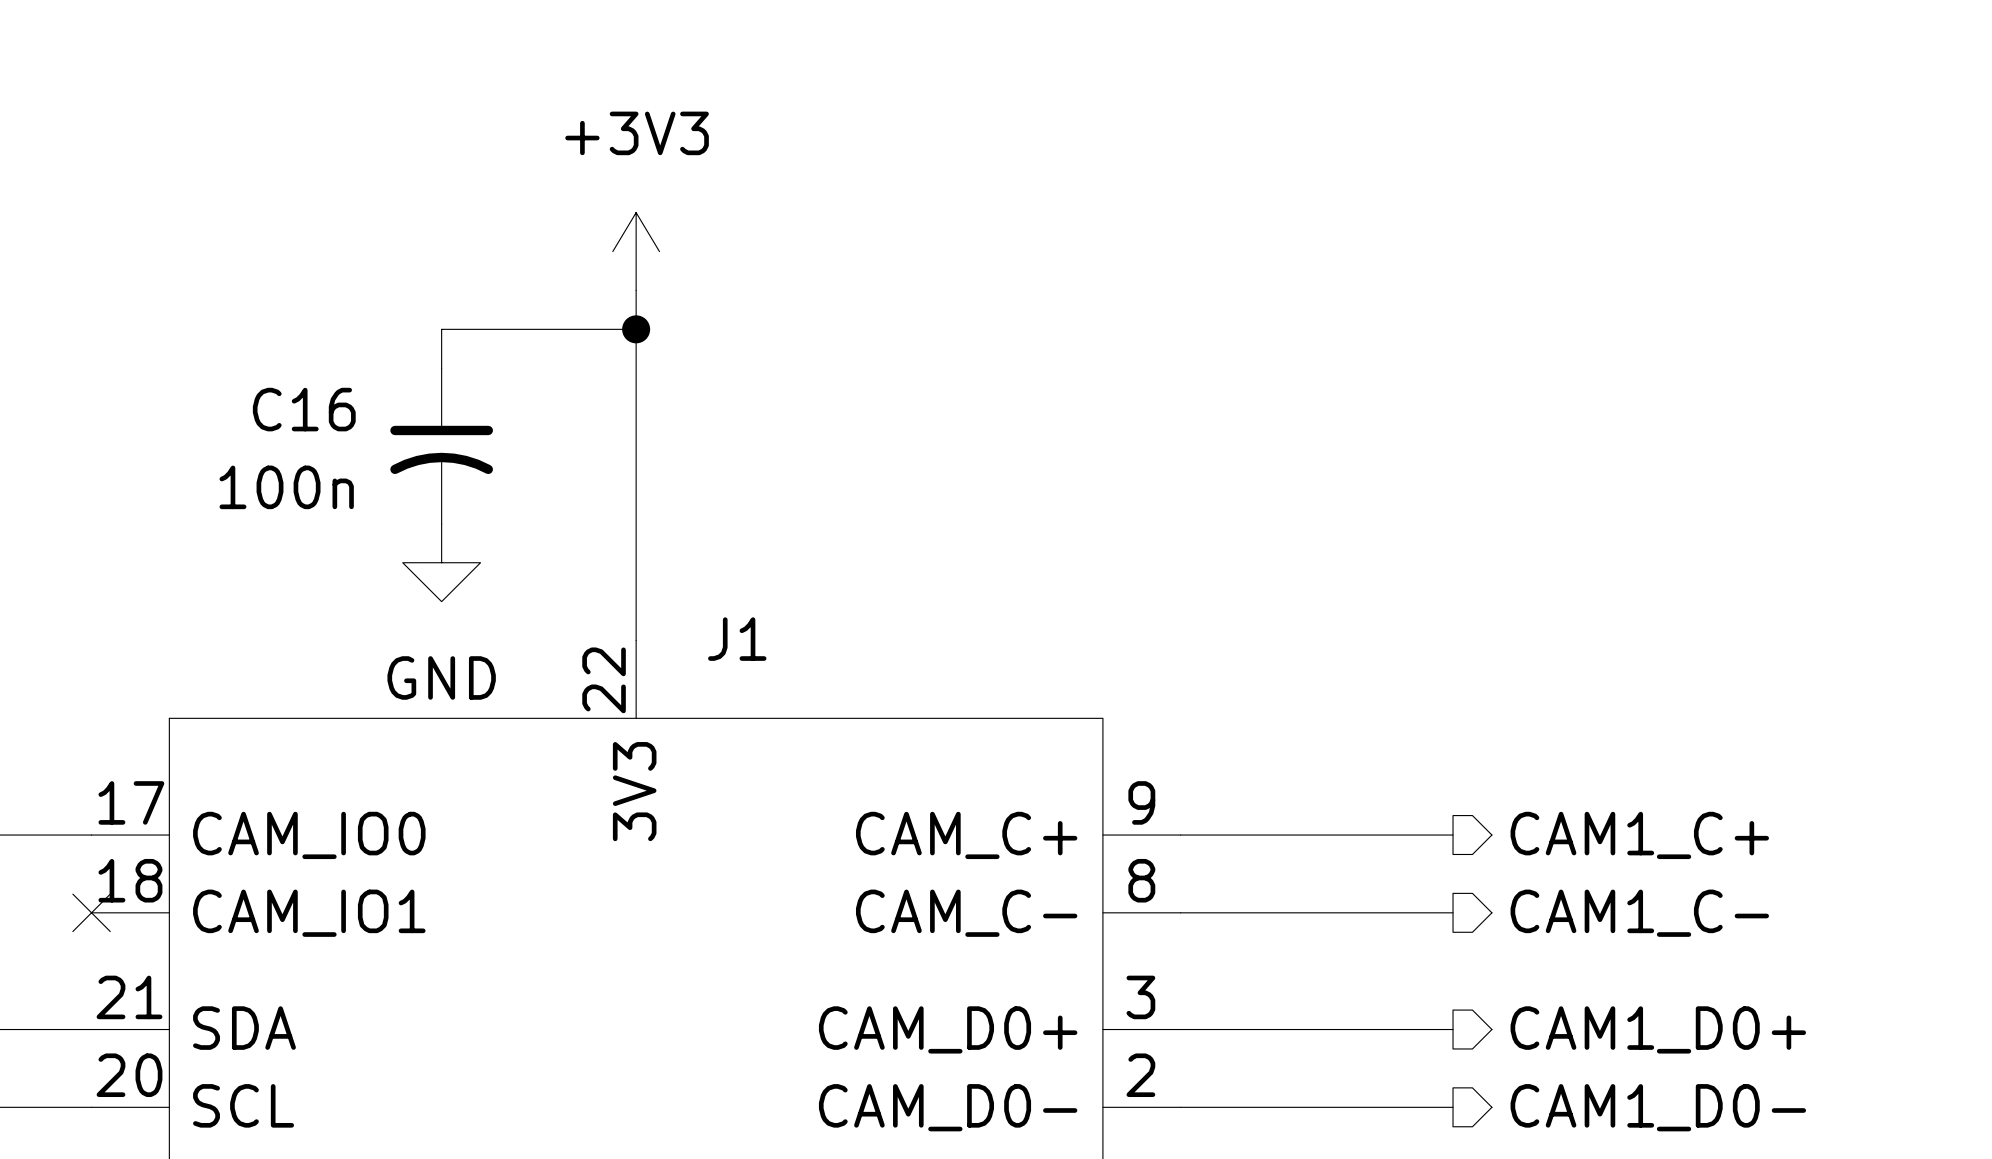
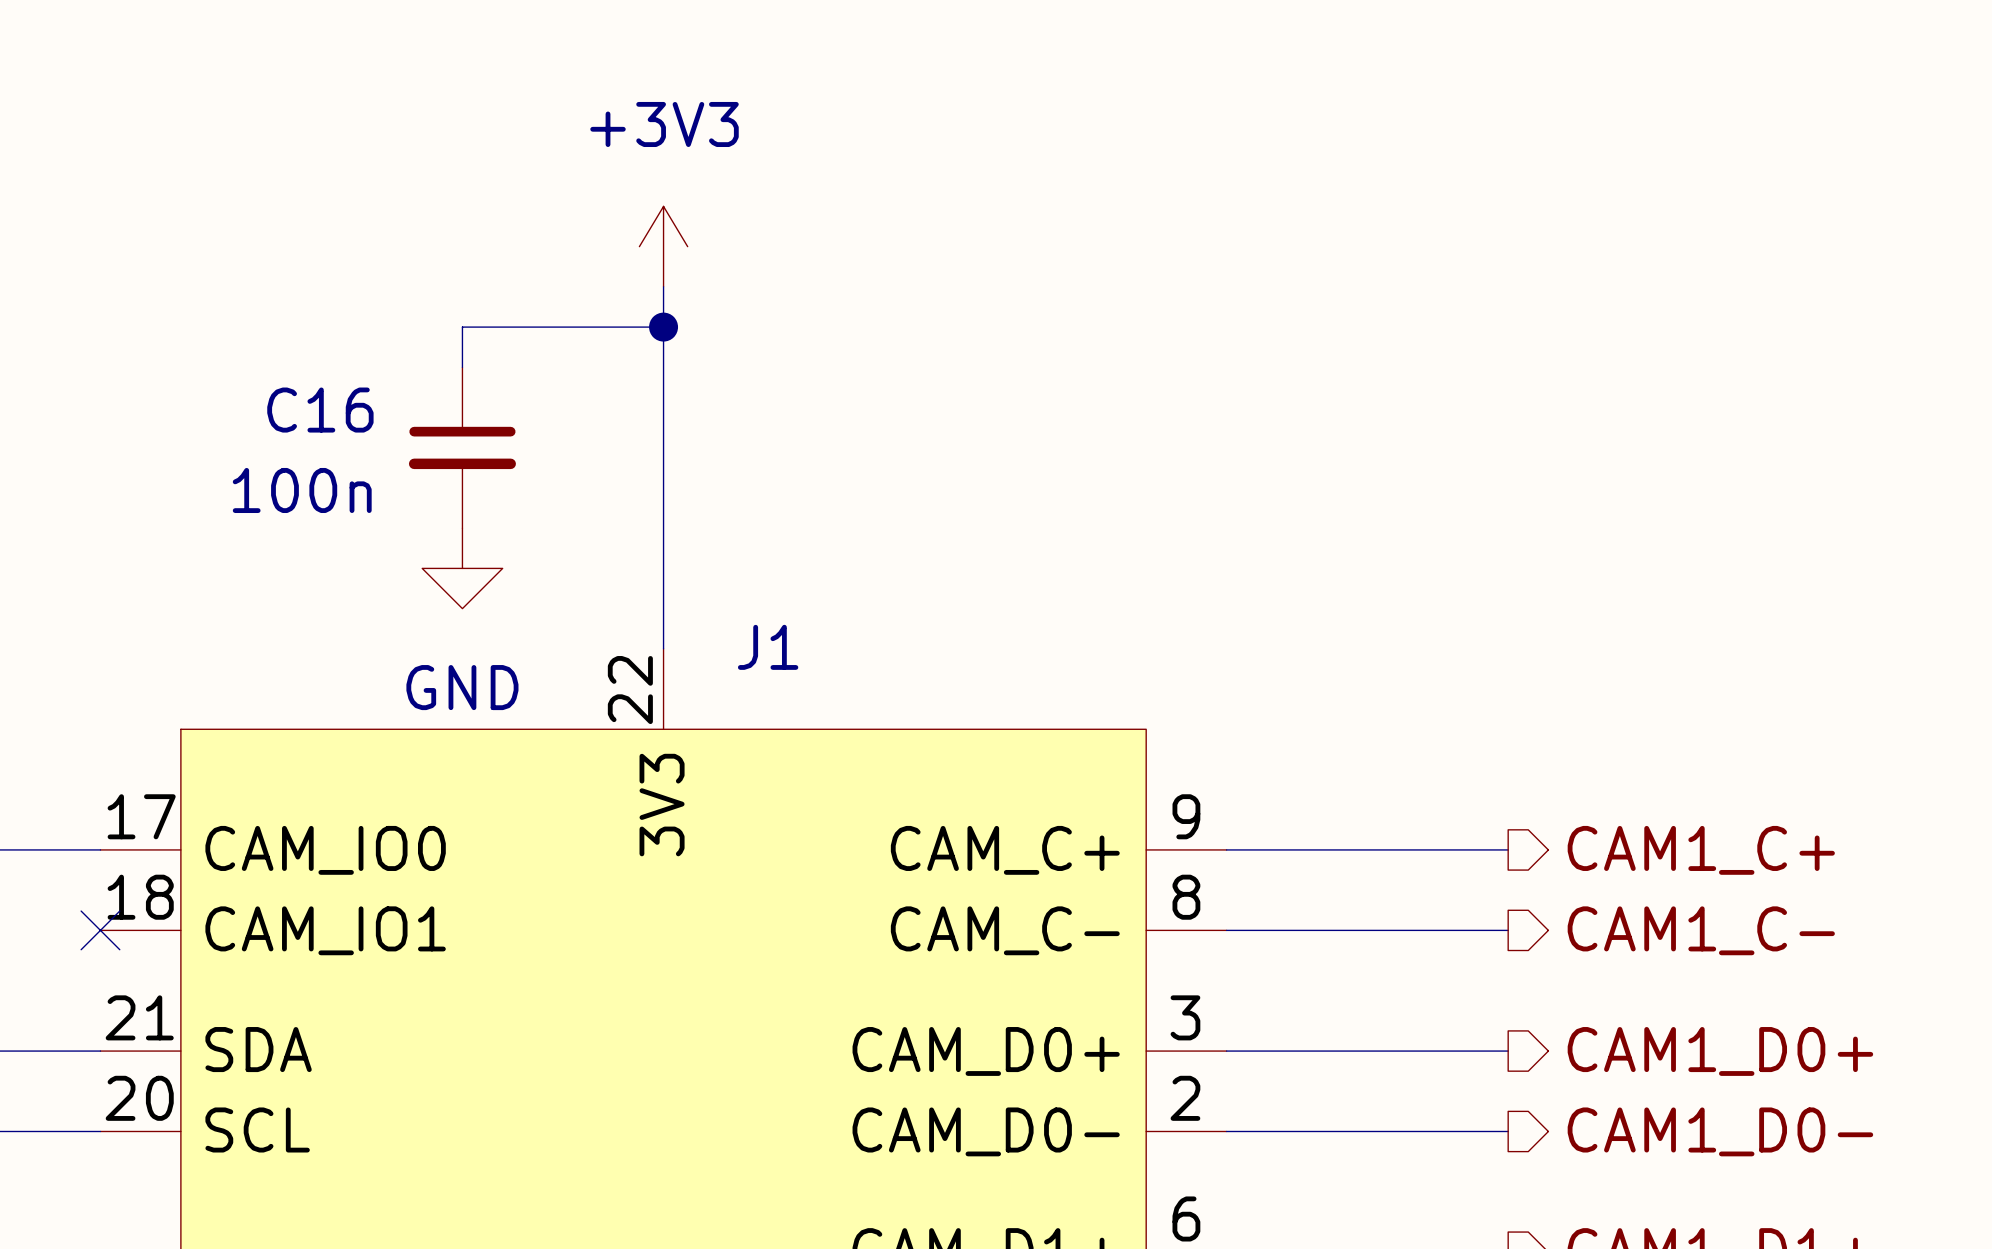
C16 symbol: [390, 368, 493, 524] -> [408, 367, 516, 529]

